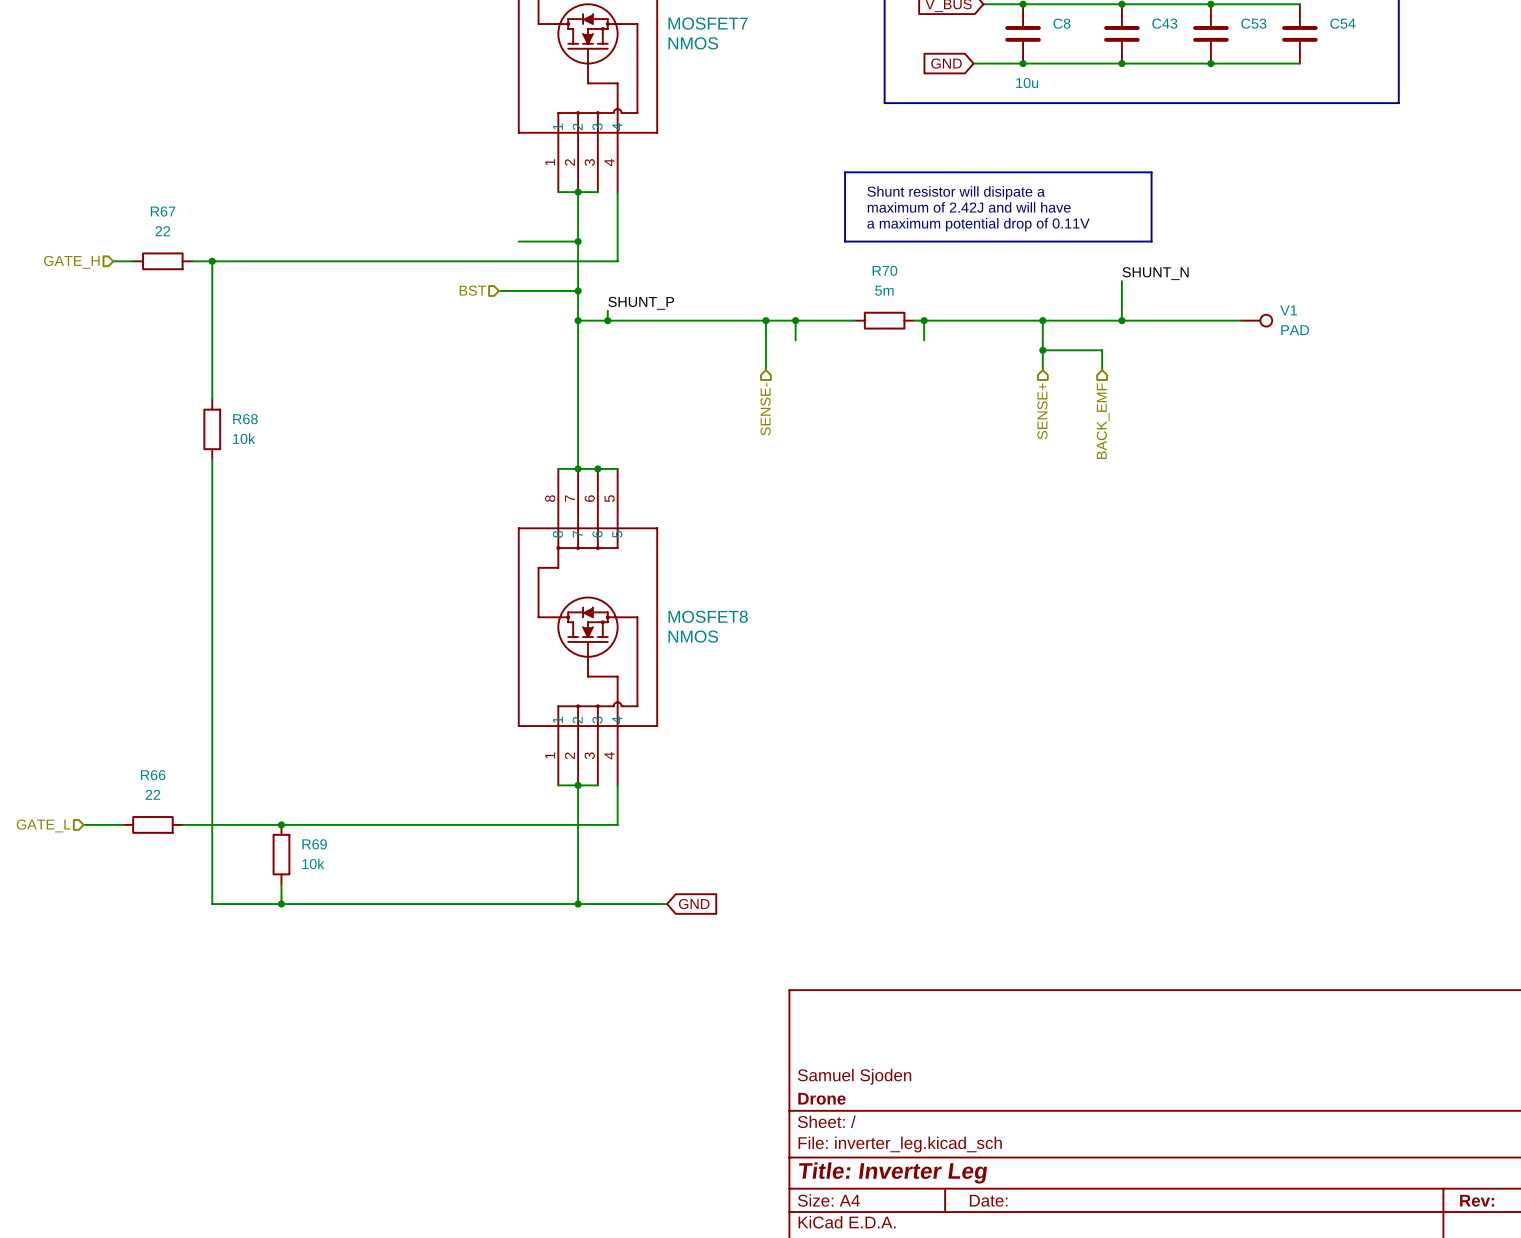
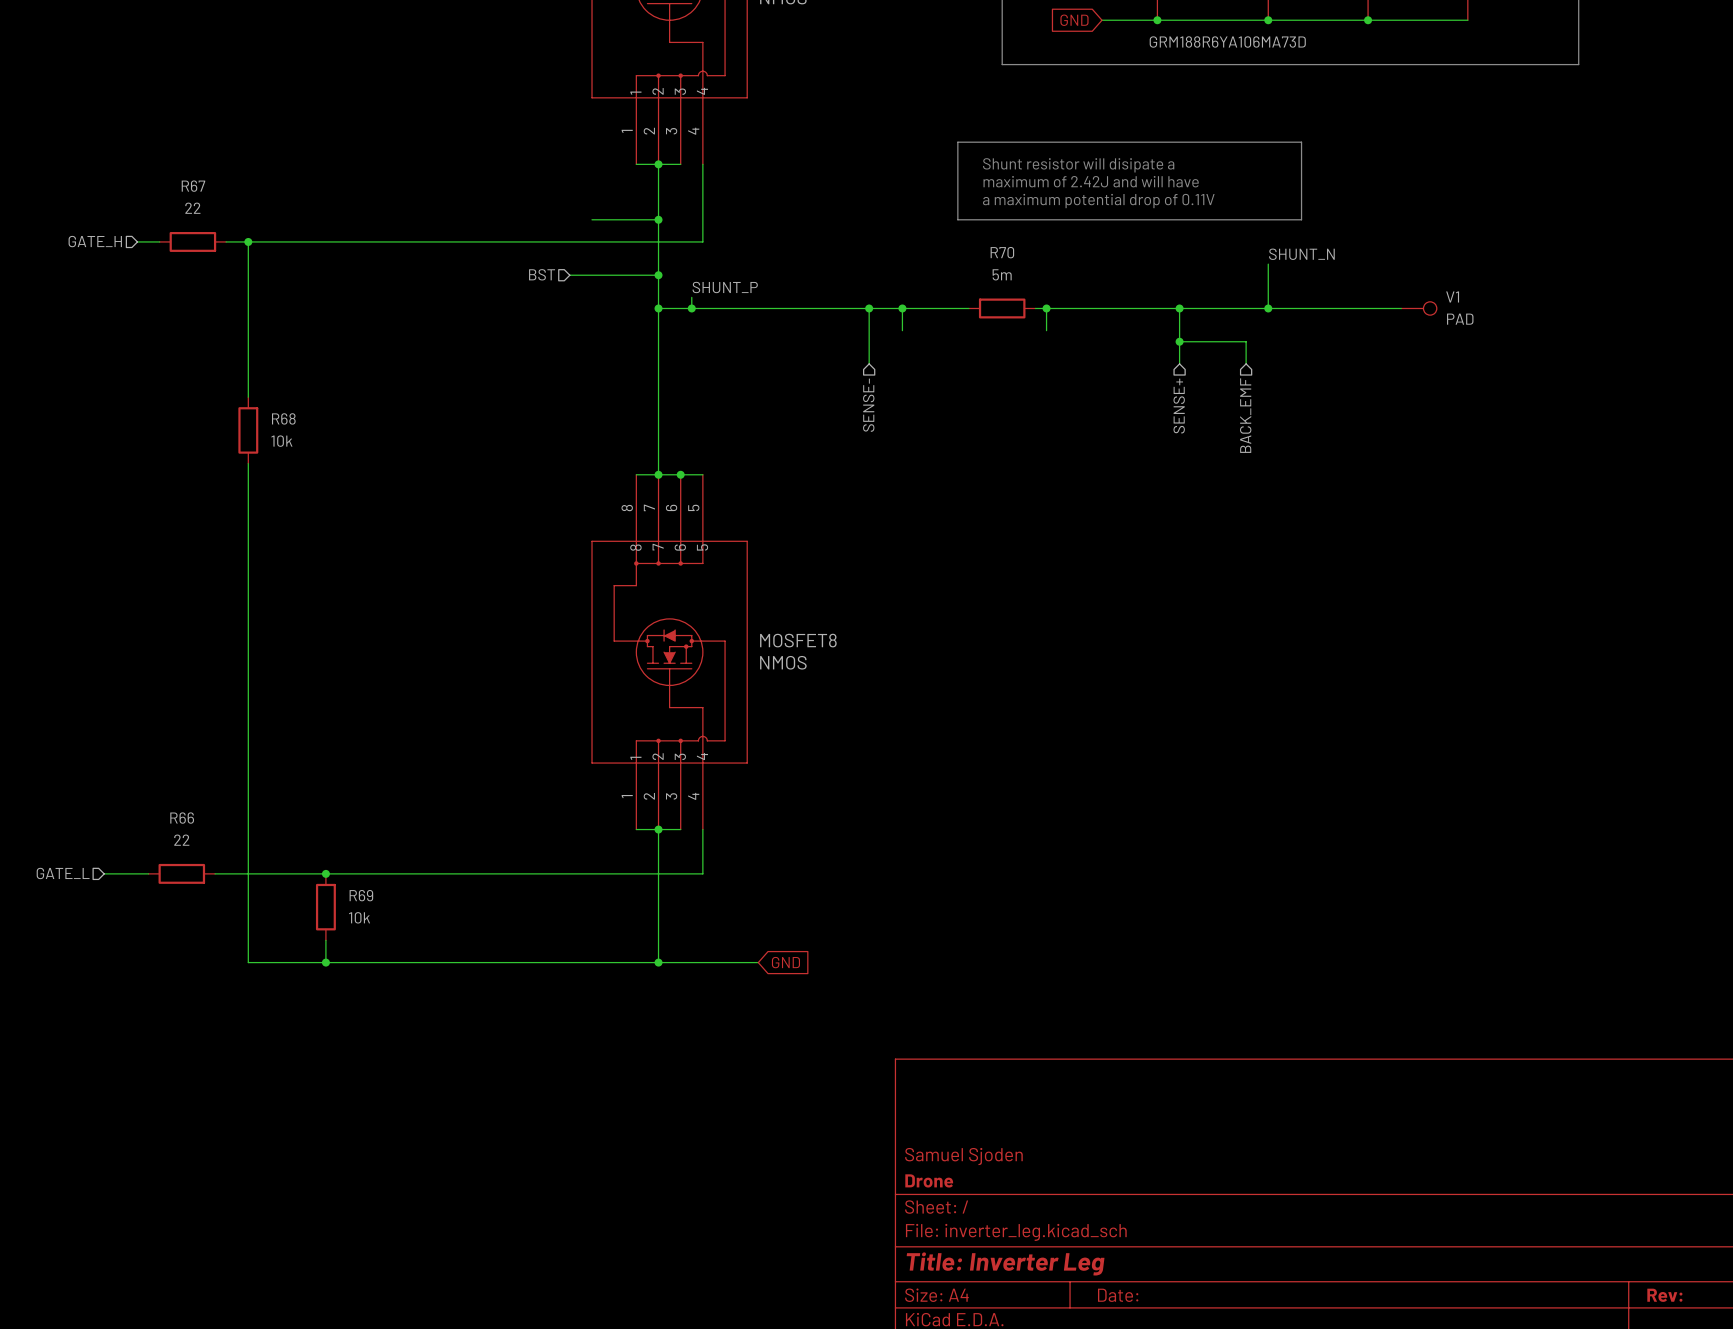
C8 value: 10u (1027, 82) -> GRM188R6YA106MA73D (1227, 41)

